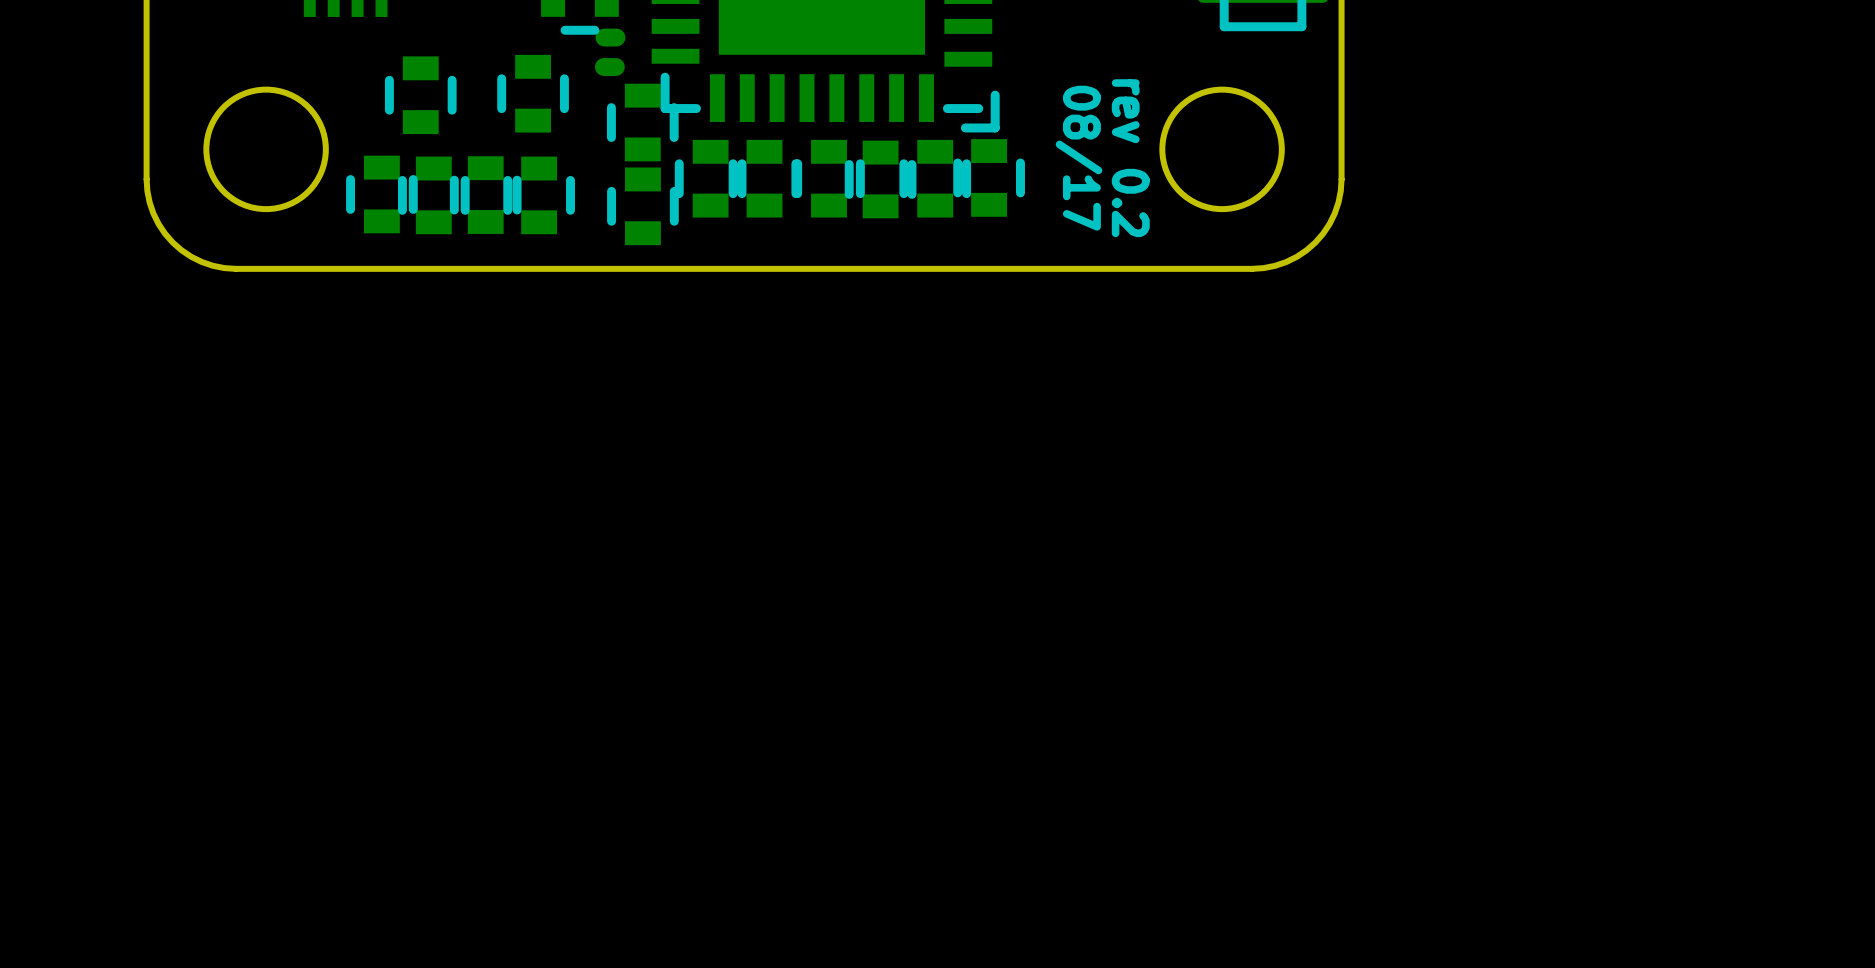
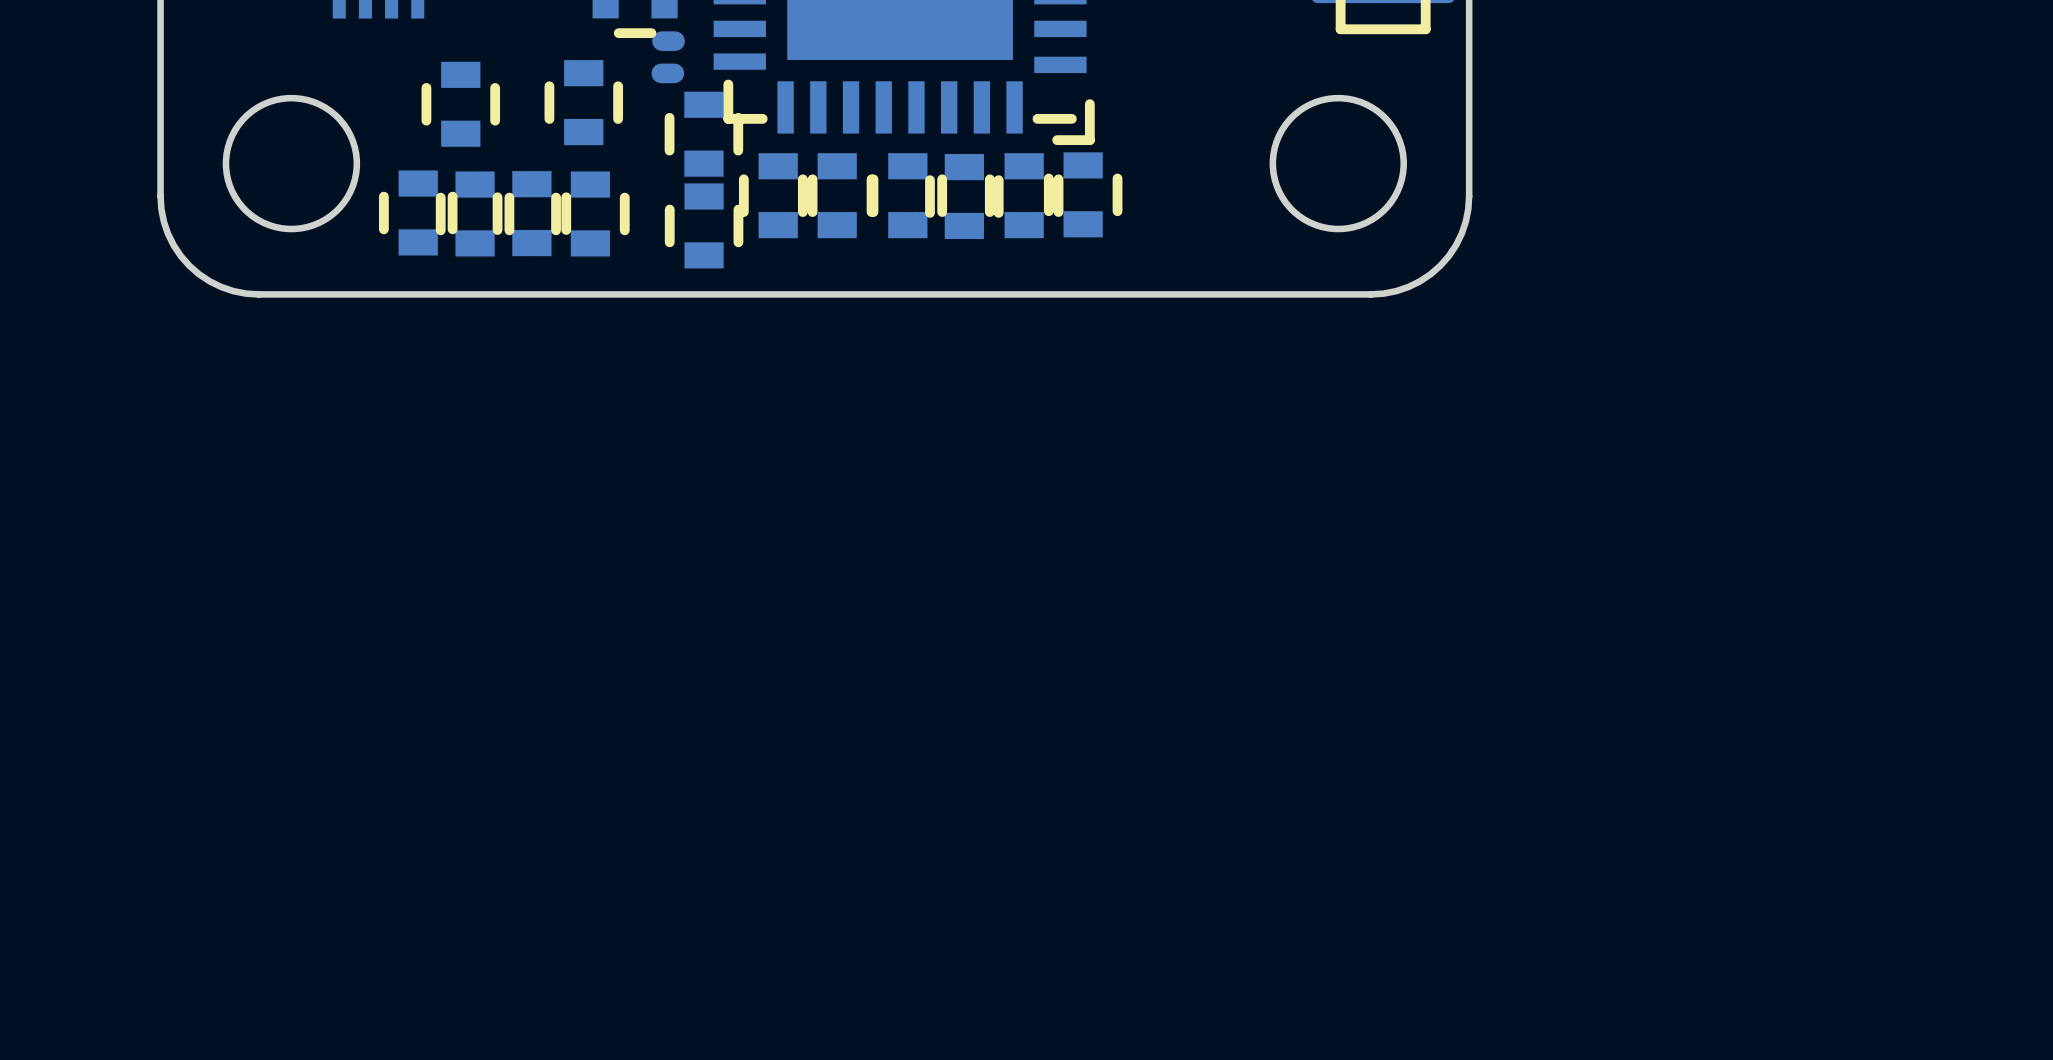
text: 08/17 (1079, 158) -> none
text: rev 0.2 (1130, 158) -> none

